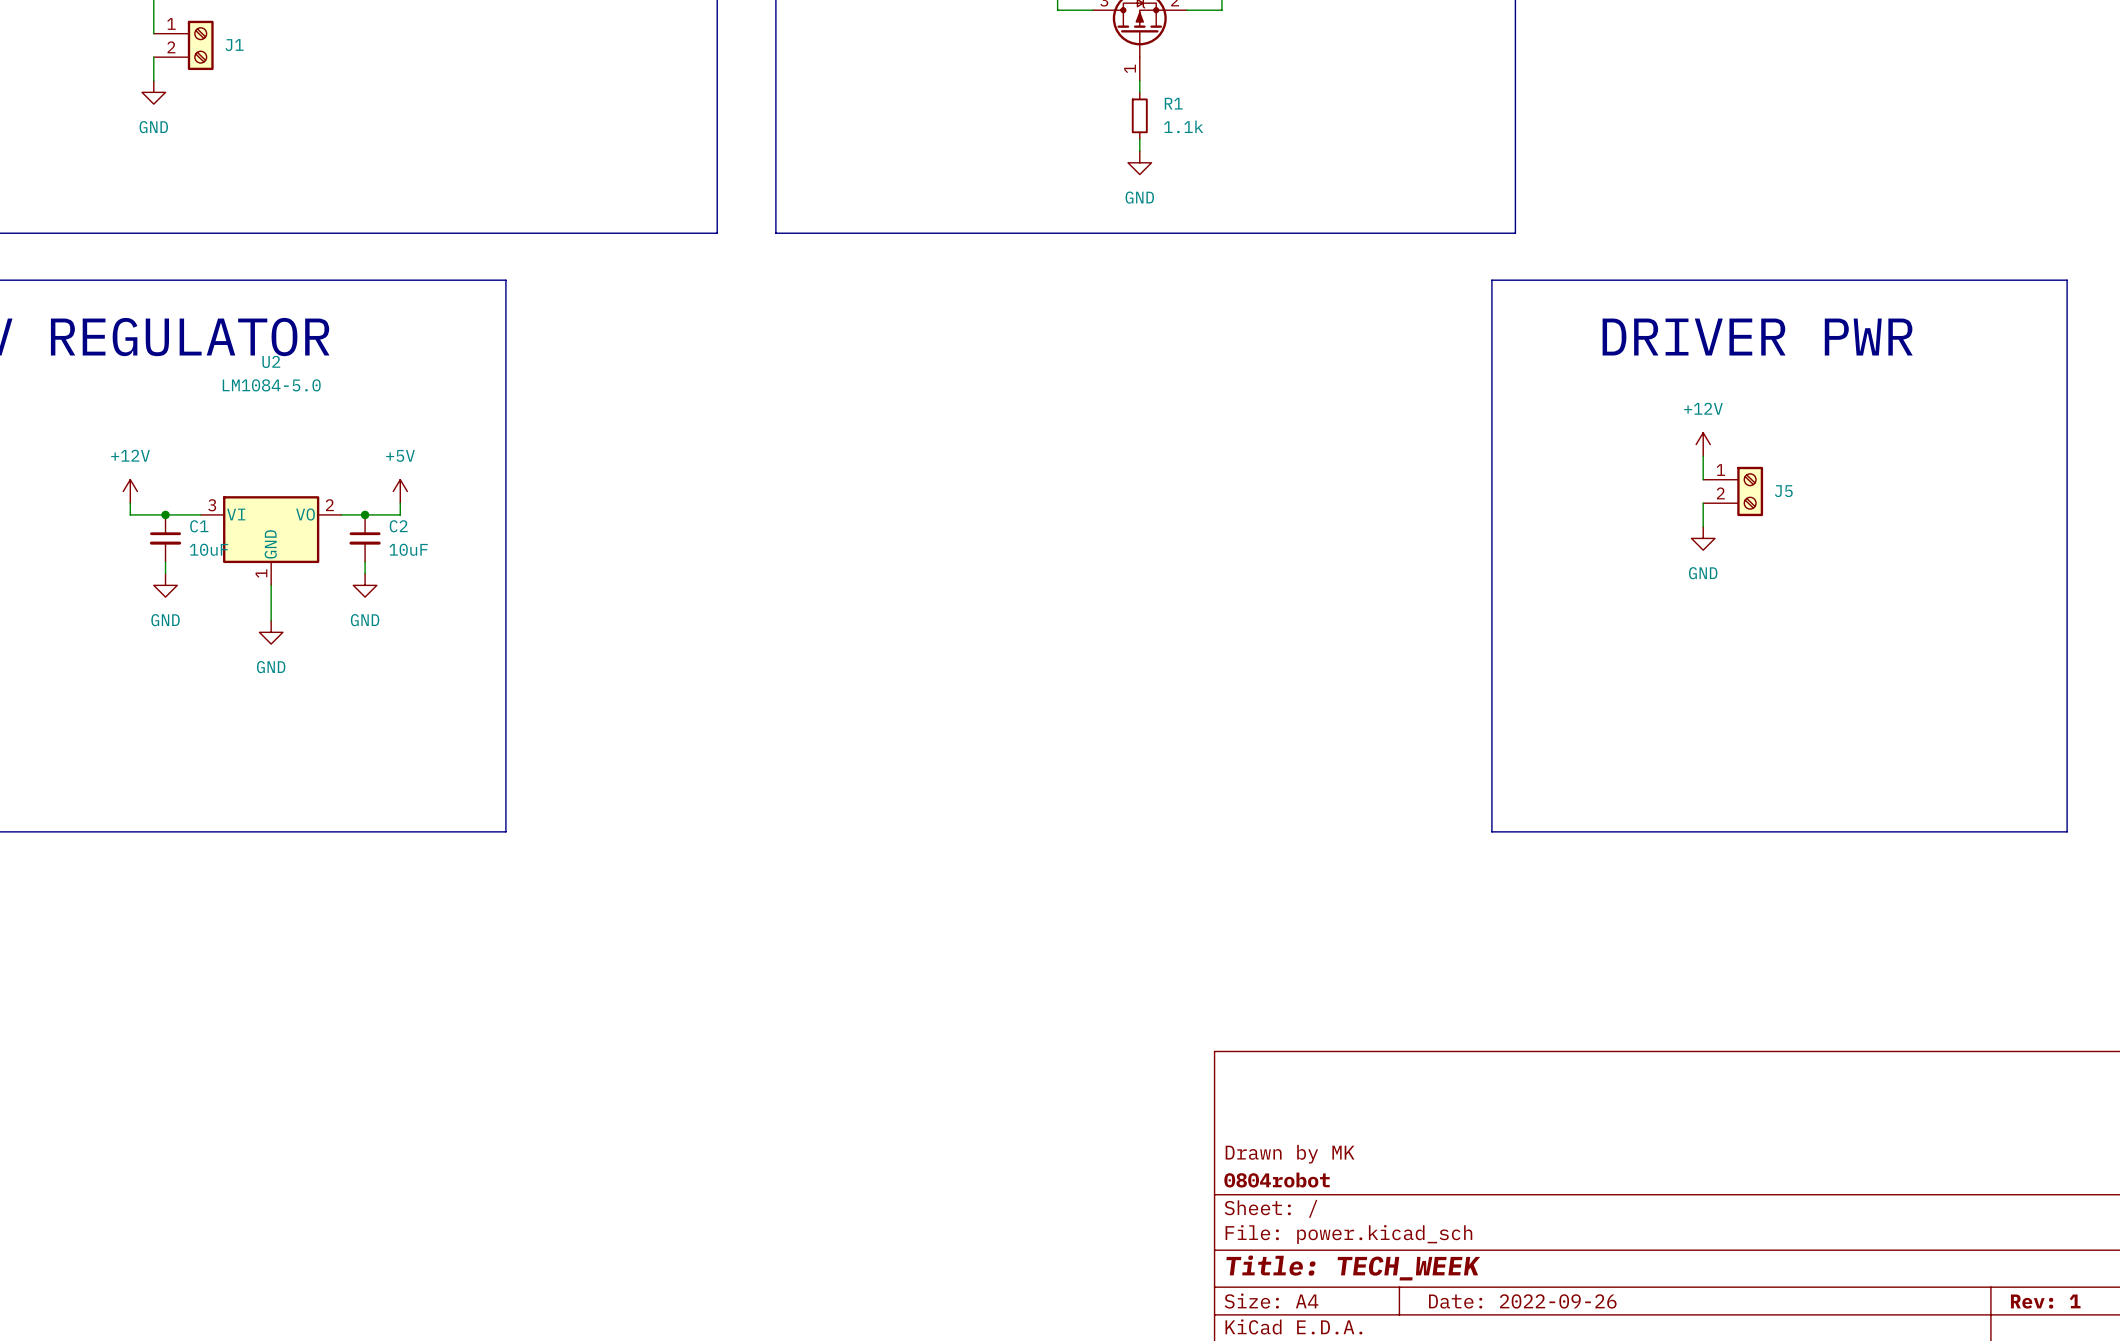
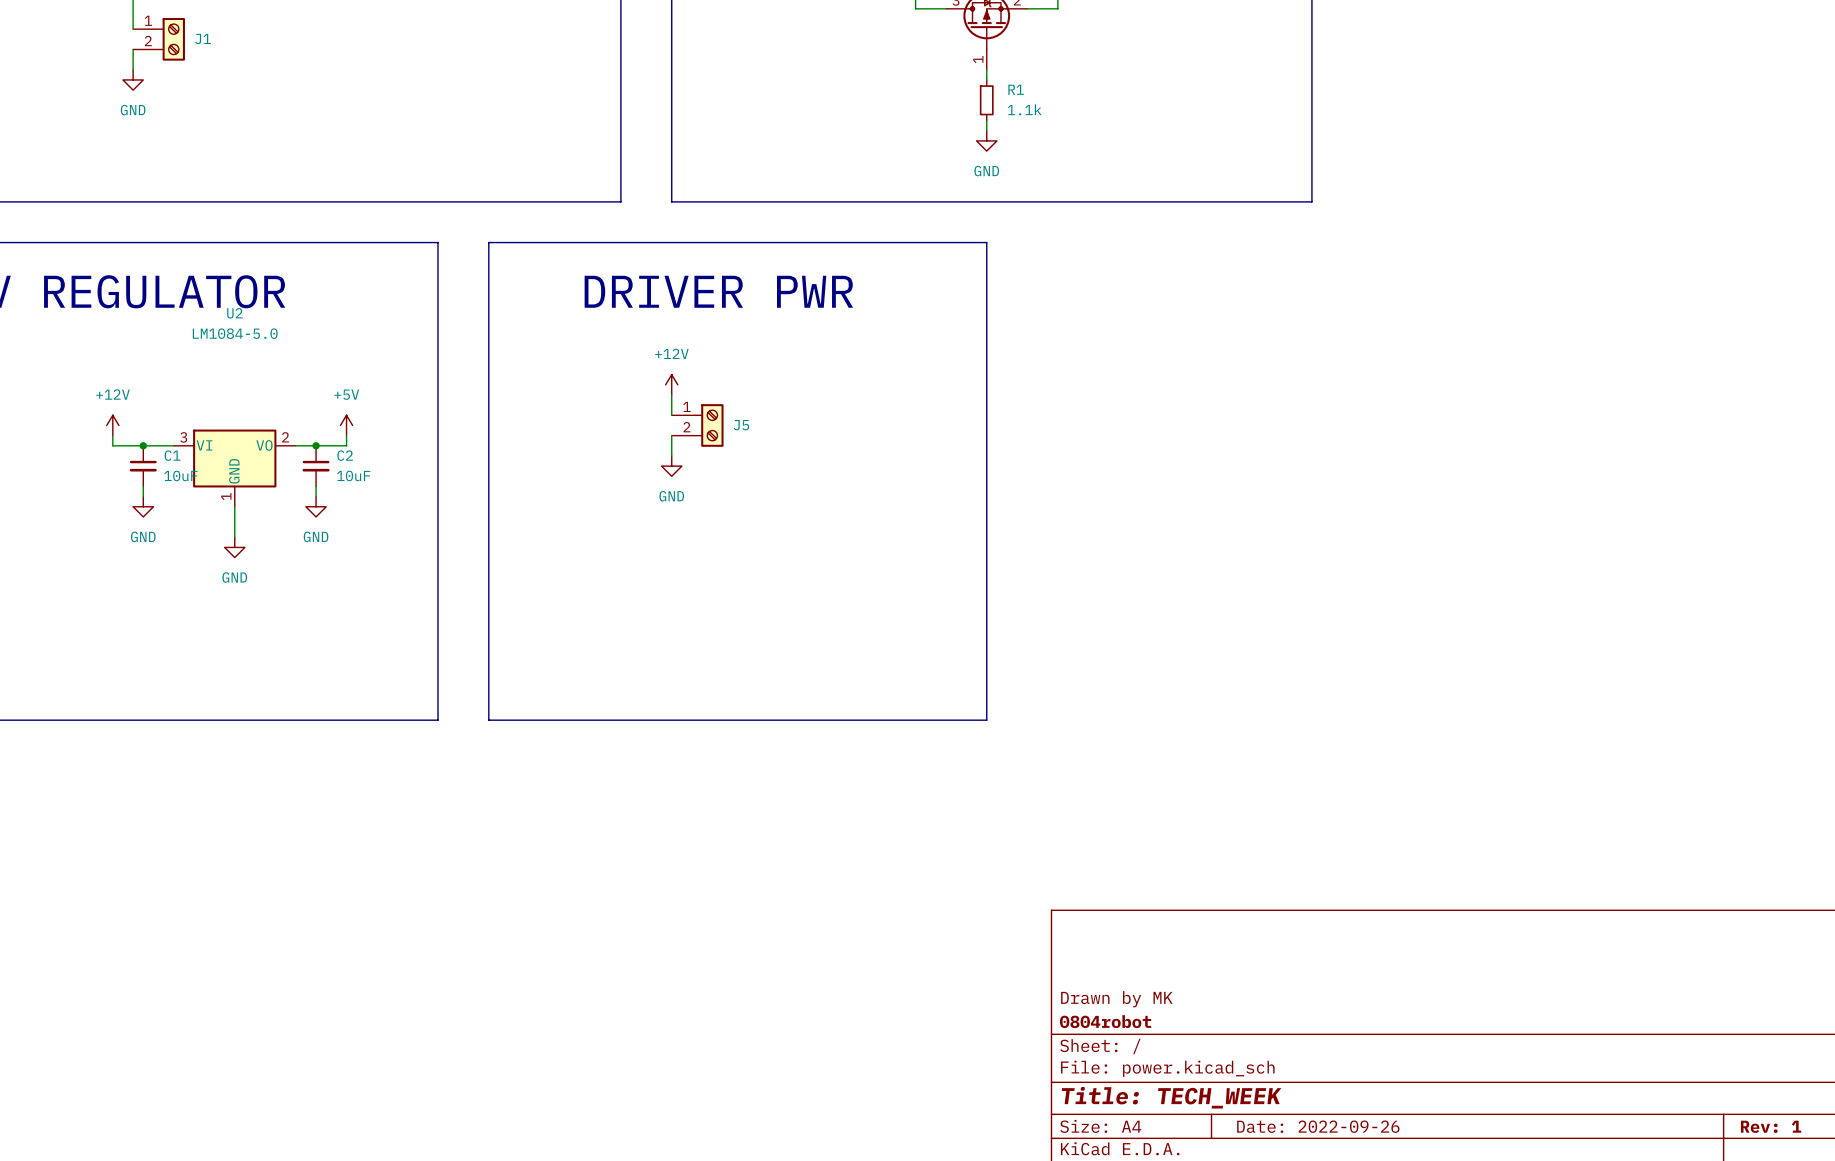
line: none -> (488, 242) (986, 242) (986, 720) (488, 720) (488, 242)
line: (1491, 280) (2067, 280) (2067, 831) (1491, 831) (1491, 280) -> none
text: none -> DRIVER PWR (718, 291)
text: DRIVER PWR (1757, 337) -> none
power symbol: none -> +12V (671, 384)
power symbol: +12V (1703, 444) -> none
wire: none -> (671, 394) (671, 415)
wire: (1703, 456) (1703, 479) -> none
J5 position: (1733, 491) -> (697, 425)
wire: none -> (671, 435) (671, 455)
wire: (1703, 503) (1703, 526) -> none
power symbol: none -> GND (671, 466)
power symbol: GND (1703, 538) -> none

